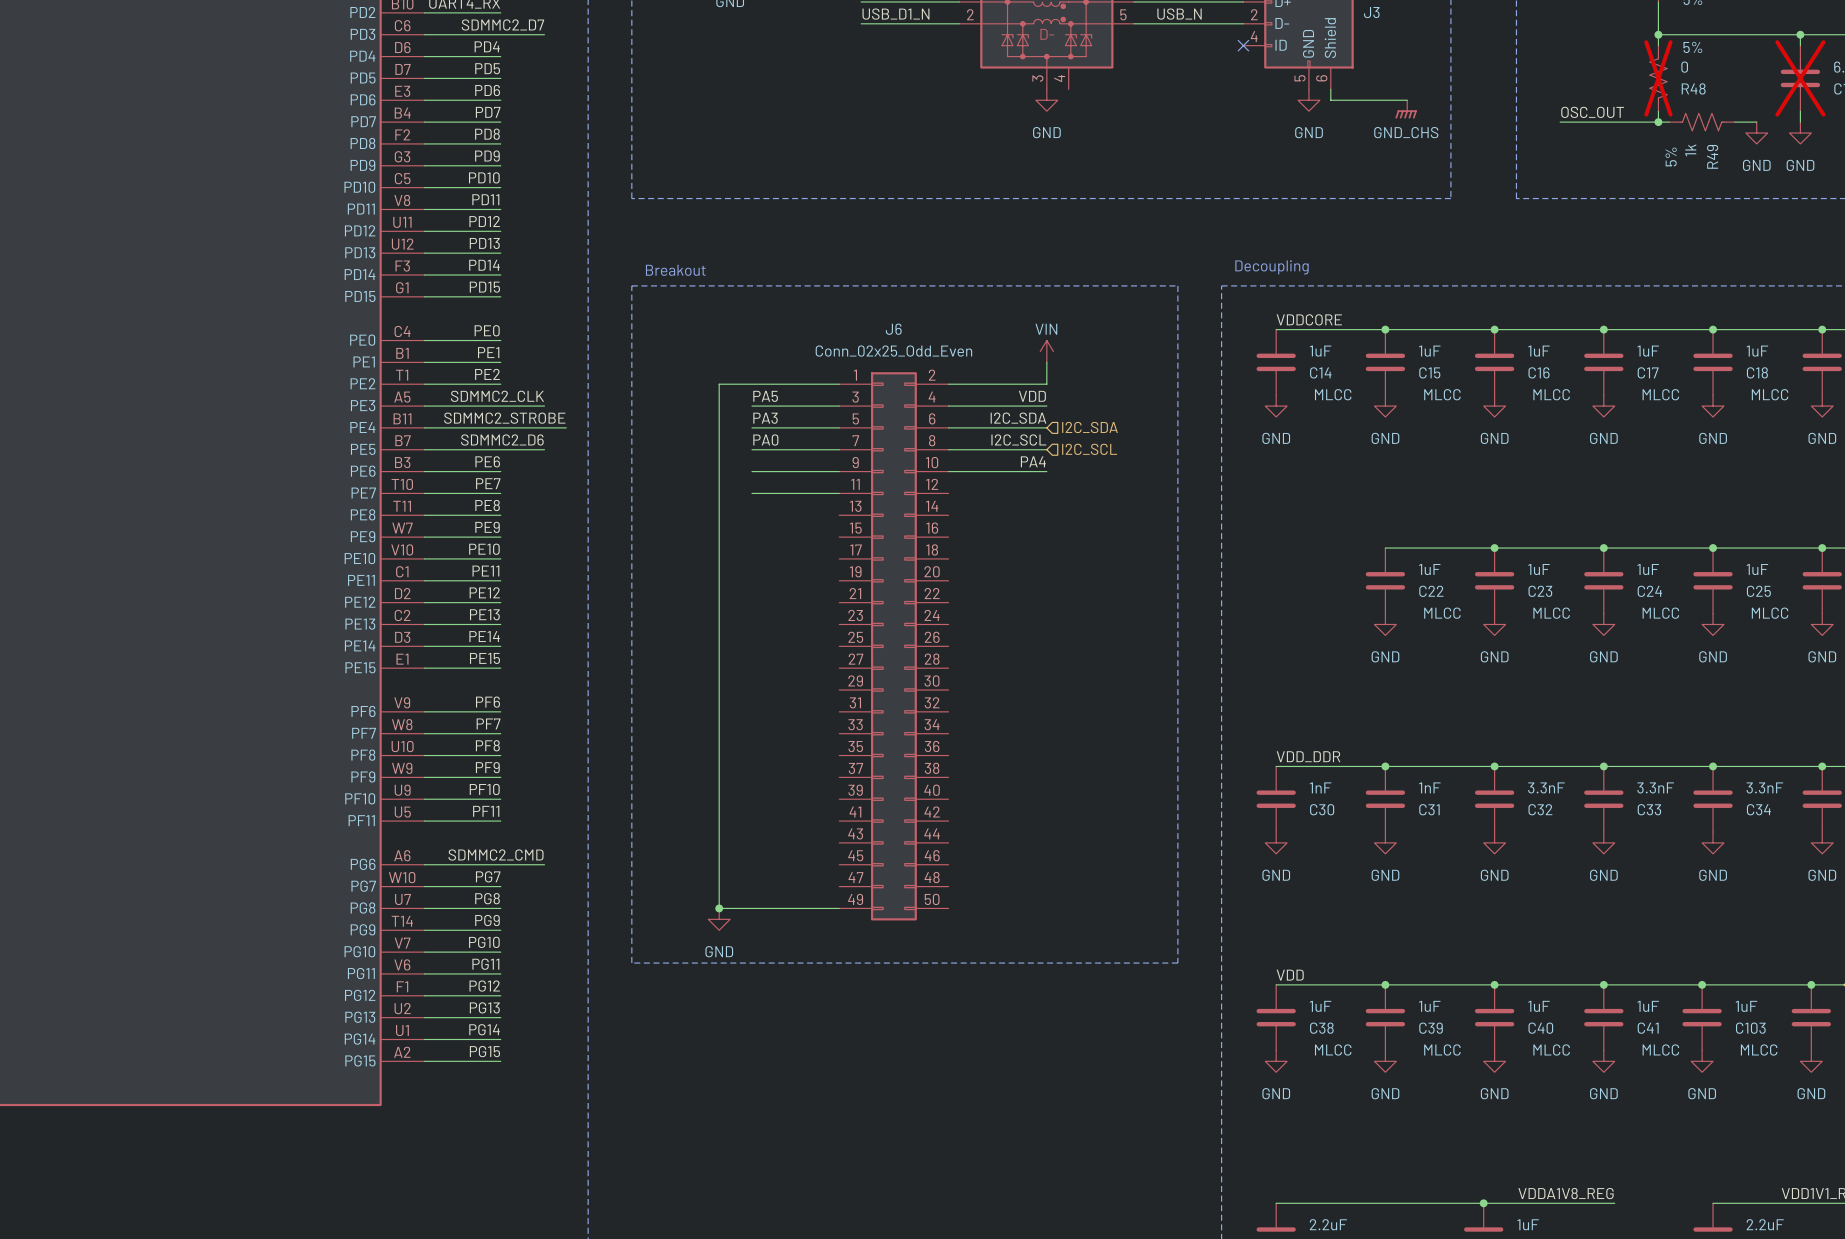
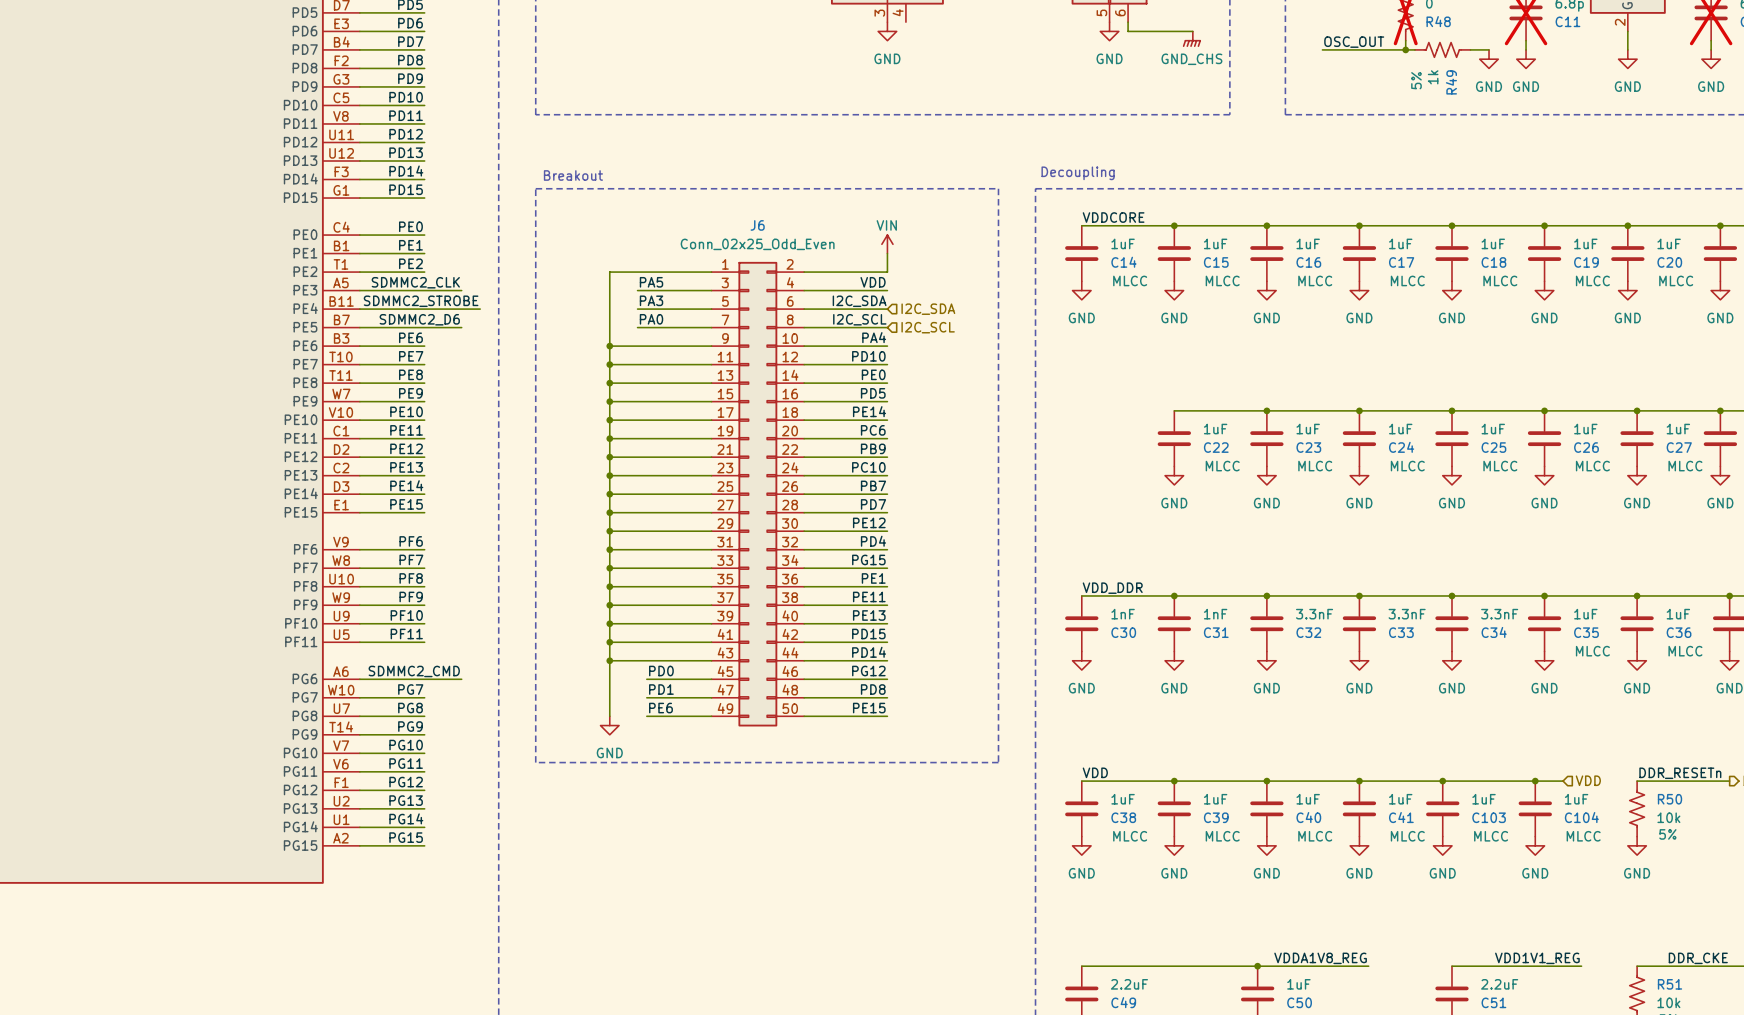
wire: none -> (609, 346) (637, 346)
junction: none -> (609, 346)
label: none -> PD10 (868, 356)
wire: none -> (609, 364) (637, 364)
junction: none -> (609, 364)
wire: none -> (804, 364) (887, 364)
label: none -> PE0 (873, 374)
wire: none -> (609, 383) (711, 383)
junction: none -> (609, 383)
wire: none -> (804, 383) (887, 383)
label: none -> PD5 (873, 393)
wire: none -> (609, 401) (711, 401)
junction: none -> (609, 401)
wire: none -> (804, 401) (887, 401)
label: none -> PE14 (869, 411)
wire: none -> (609, 420) (711, 420)
junction: none -> (609, 420)
wire: none -> (804, 420) (887, 420)
label: none -> PC6 (873, 430)
wire: none -> (609, 438) (711, 438)
junction: none -> (609, 438)
wire: none -> (804, 438) (887, 438)
label: none -> PB9 (873, 448)
wire: none -> (609, 457) (711, 457)
junction: none -> (609, 457)
wire: none -> (804, 457) (887, 457)
label: none -> PC10 (868, 467)
wire: none -> (609, 475) (711, 475)
junction: none -> (609, 475)
wire: none -> (804, 475) (887, 475)
label: none -> PB7 (873, 485)
wire: none -> (609, 494) (711, 494)
junction: none -> (609, 494)
wire: none -> (804, 494) (887, 494)
label: none -> PD7 (873, 504)
wire: none -> (609, 512) (711, 512)
junction: none -> (609, 512)
wire: none -> (804, 512) (887, 512)
label: none -> PE12 (869, 522)
wire: none -> (609, 531) (711, 531)
junction: none -> (609, 531)
wire: none -> (804, 531) (887, 531)
label: none -> PD4 (873, 541)
wire: none -> (609, 549) (711, 549)
junction: none -> (609, 549)
wire: none -> (804, 549) (887, 549)
label: none -> PG15 (868, 559)
wire: none -> (609, 568) (711, 568)
junction: none -> (609, 568)
wire: none -> (804, 568) (887, 568)
label: none -> PE1 (873, 578)
wire: none -> (609, 586) (711, 586)
junction: none -> (609, 586)
wire: none -> (804, 586) (887, 586)
label: none -> PE11 (869, 596)
wire: none -> (609, 605) (711, 605)
junction: none -> (609, 605)
wire: none -> (804, 605) (887, 605)
label: none -> PE13 (869, 615)
wire: none -> (609, 623) (711, 623)
junction: none -> (609, 623)
wire: none -> (804, 623) (887, 623)
label: none -> PD15 (868, 634)
wire: none -> (609, 642) (711, 642)
junction: none -> (609, 642)
wire: none -> (804, 642) (887, 642)
label: none -> PD14 (869, 652)
wire: none -> (609, 660) (711, 660)
junction: none -> (609, 660)
wire: none -> (804, 660) (887, 660)
label: none -> PD0 (661, 671)
label: none -> PG12 (868, 671)
wire: none -> (646, 679) (711, 679)
wire: none -> (804, 679) (887, 679)
label: none -> PD1 (661, 689)
label: none -> PD8 (873, 689)
wire: none -> (646, 697) (711, 697)
wire: none -> (804, 697) (887, 697)
label: none -> PE6 (660, 708)
label: none -> PE15 (869, 708)
wire: (719, 908) (762, 908) -> none
junction: (719, 908) -> none
wire: none -> (804, 716) (887, 716)

